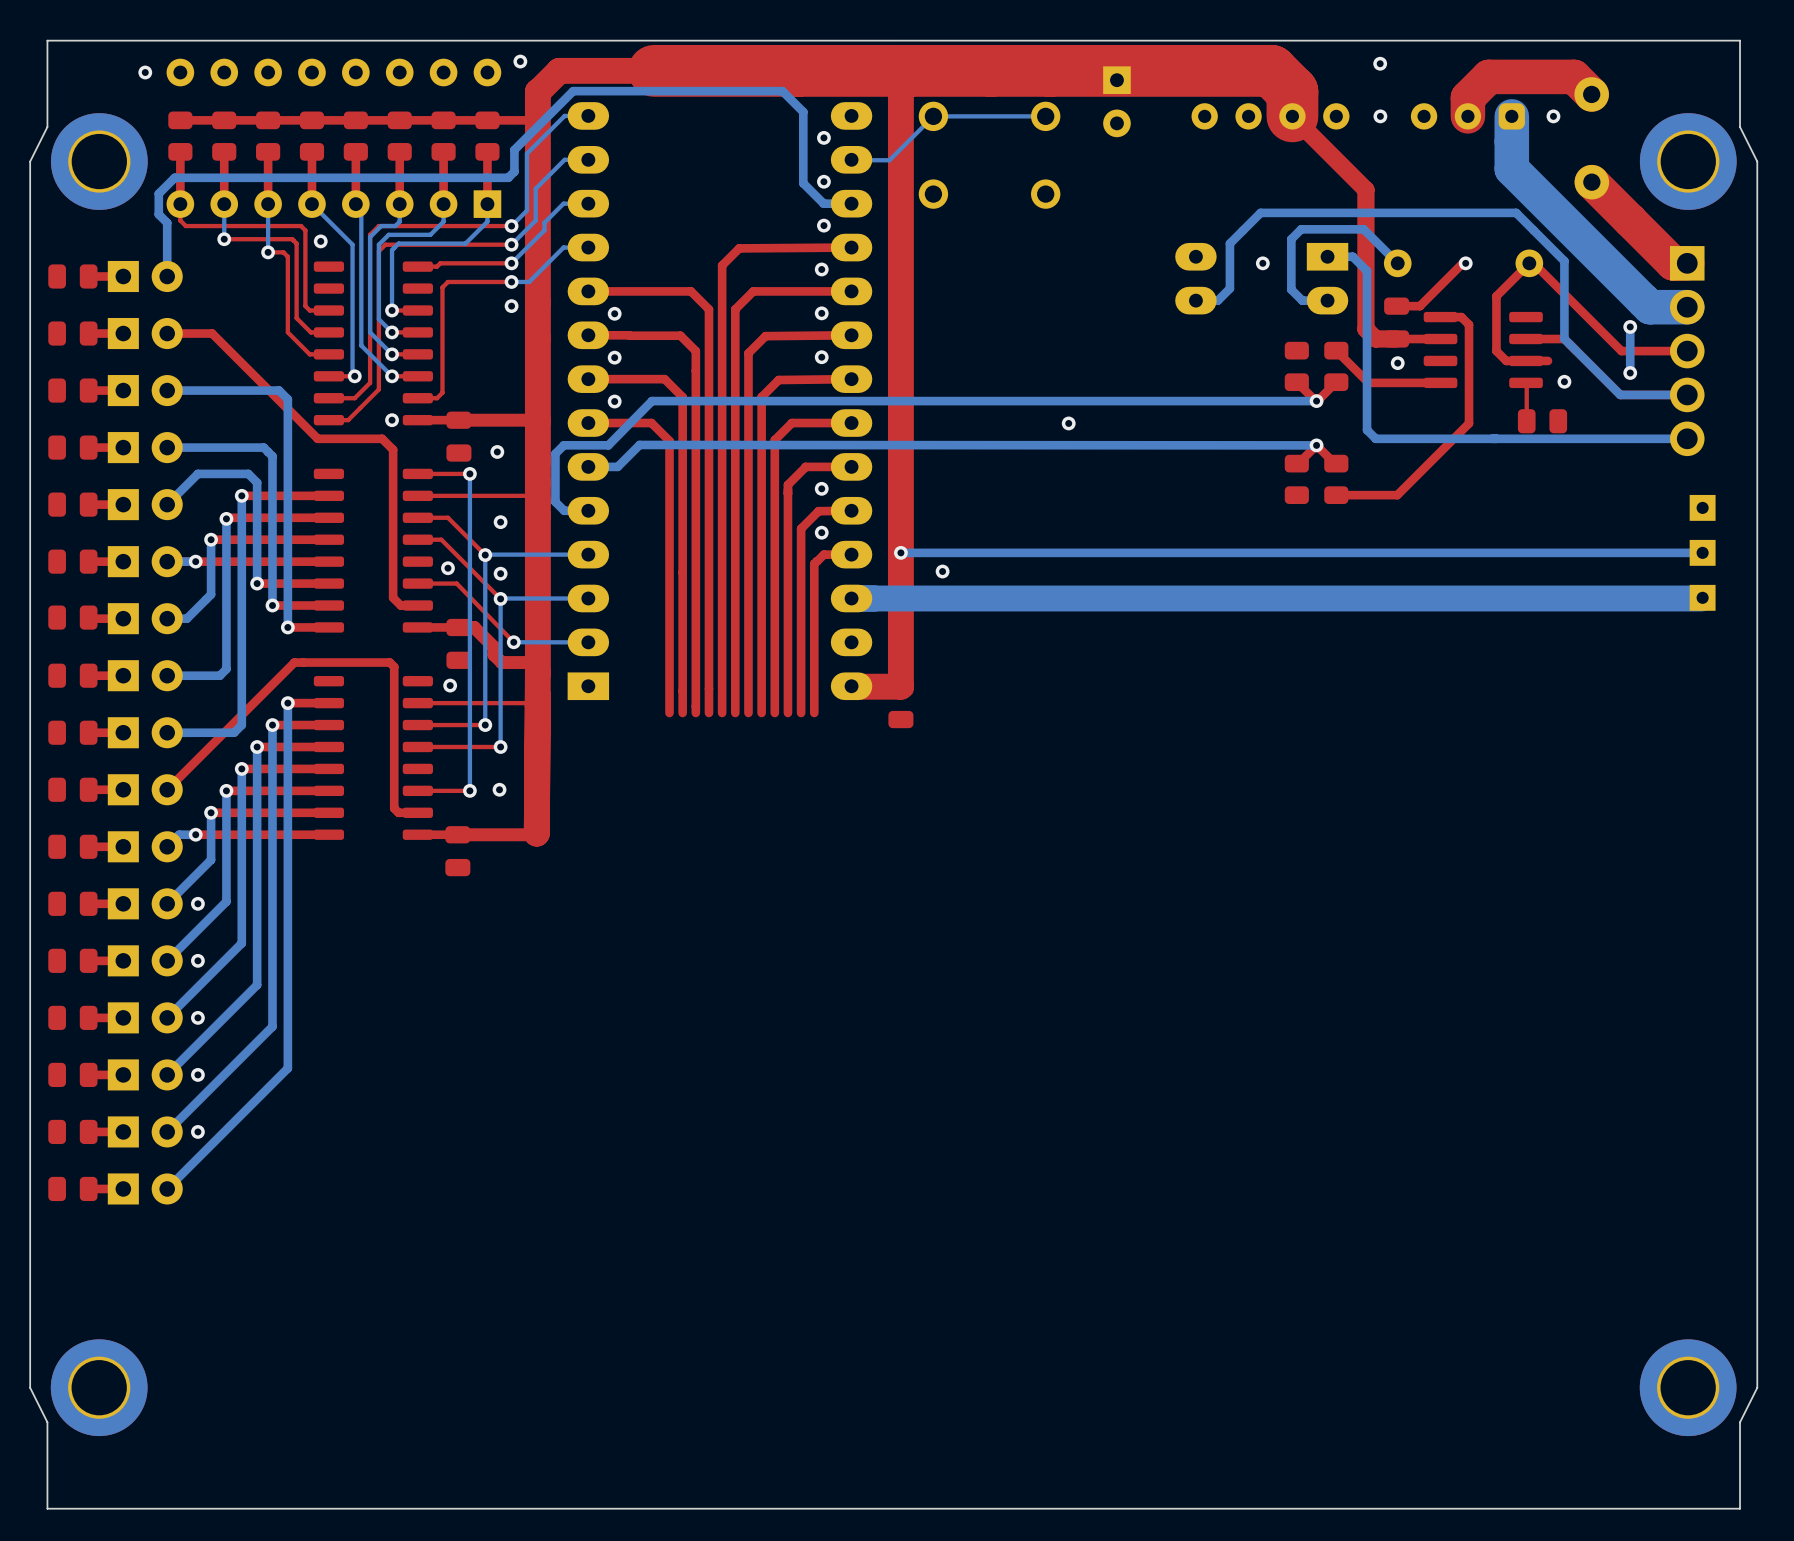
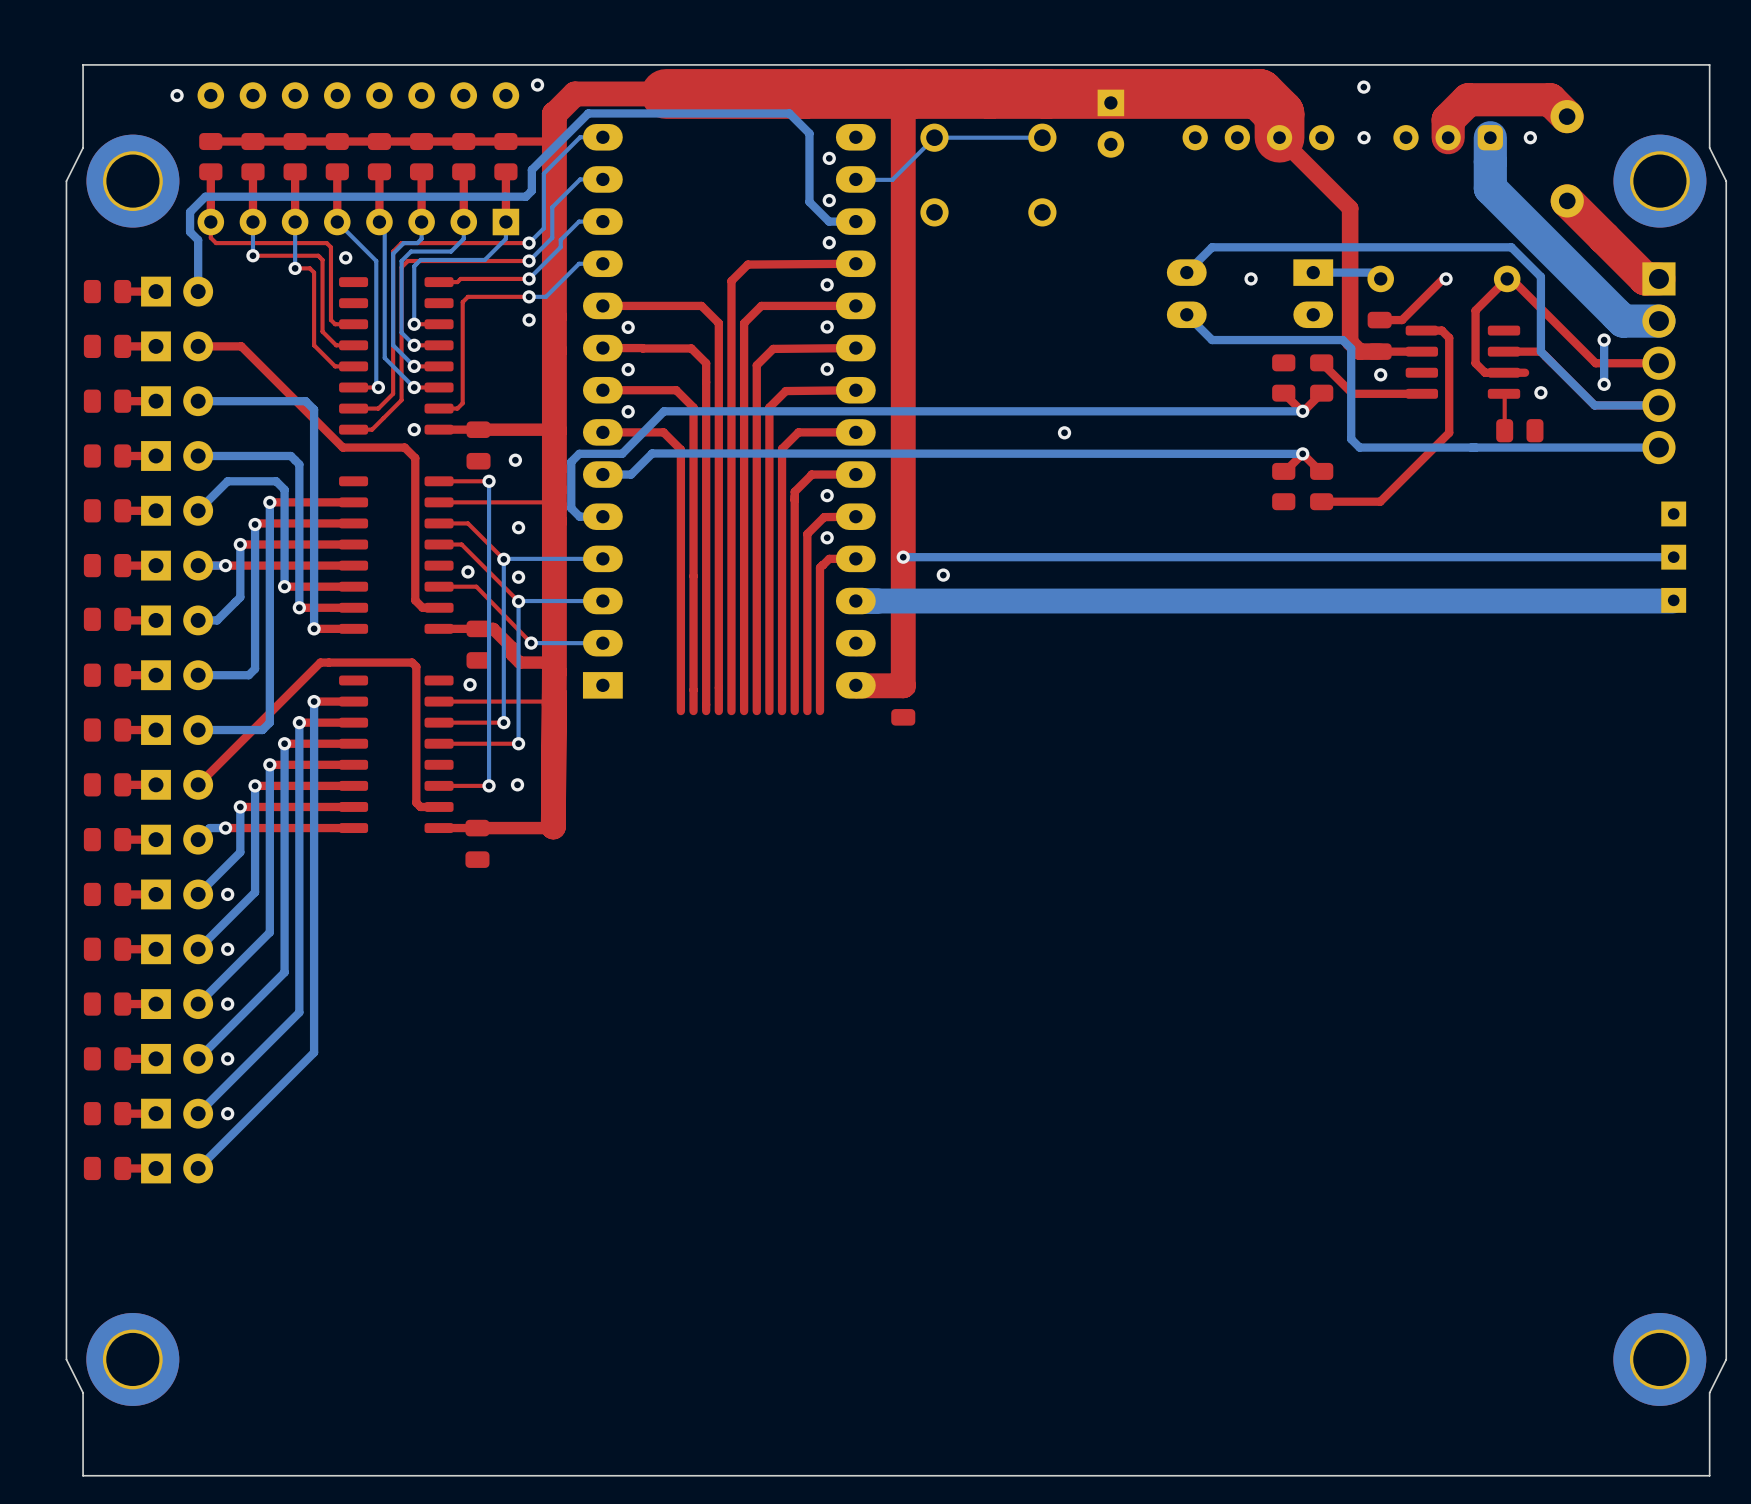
bottom track: (1533, 230) (1516, 212) (1260, 212) (1229, 243) (1229, 288) (1217, 300) (1195, 300) -> (1511, 247) (1212, 247) (1186, 272)
bottom track: (1352, 256) (1367, 271) (1367, 335) -> (1186, 314) (1212, 340) (1342, 340) (1351, 348)
bottom track: (1391, 256) (1363, 229) (1301, 229) (1291, 239) (1291, 289) (1302, 300) (1327, 300) -> (1374, 272) (1337, 272)

